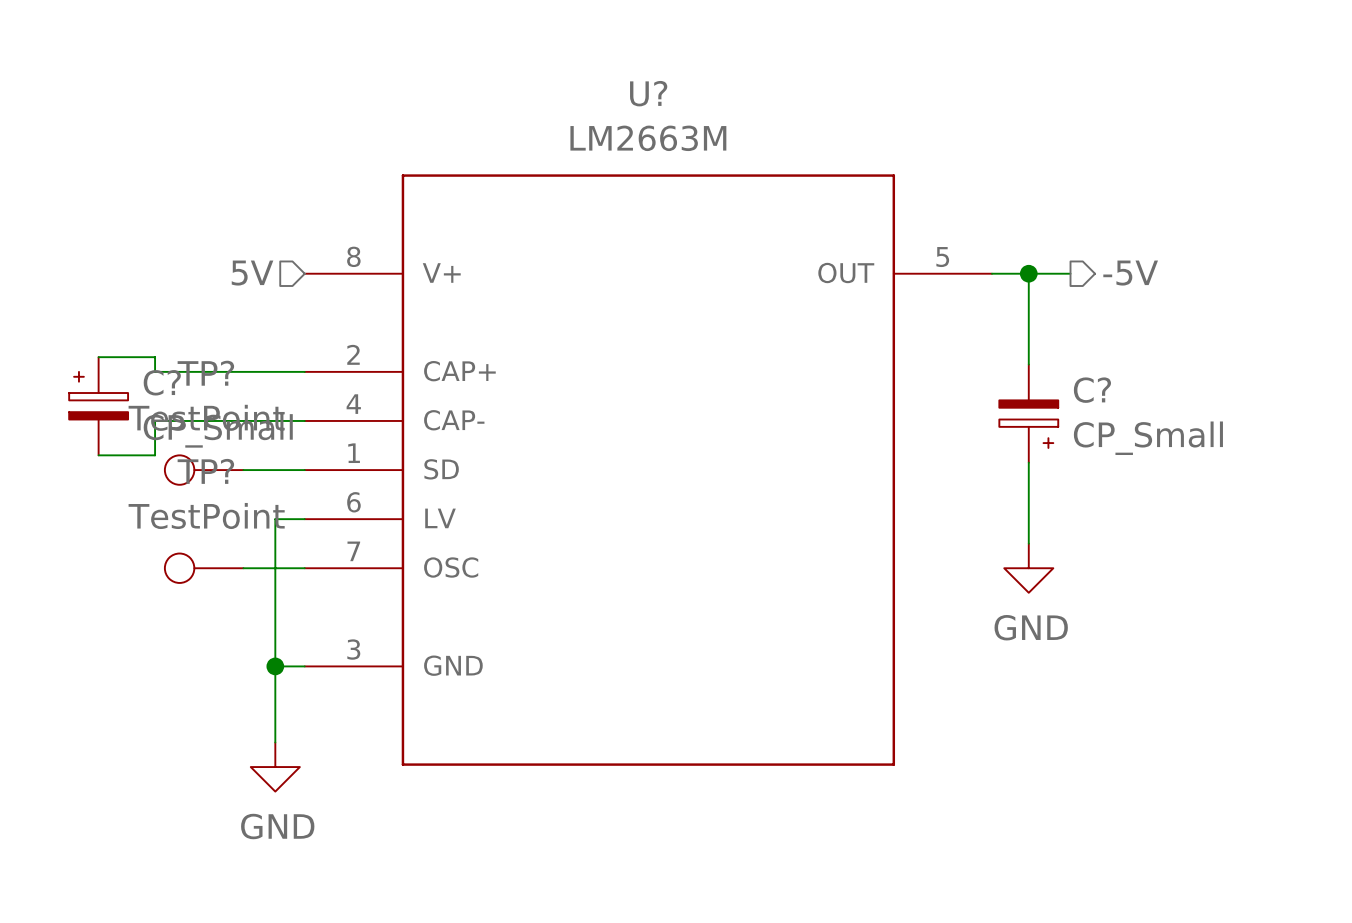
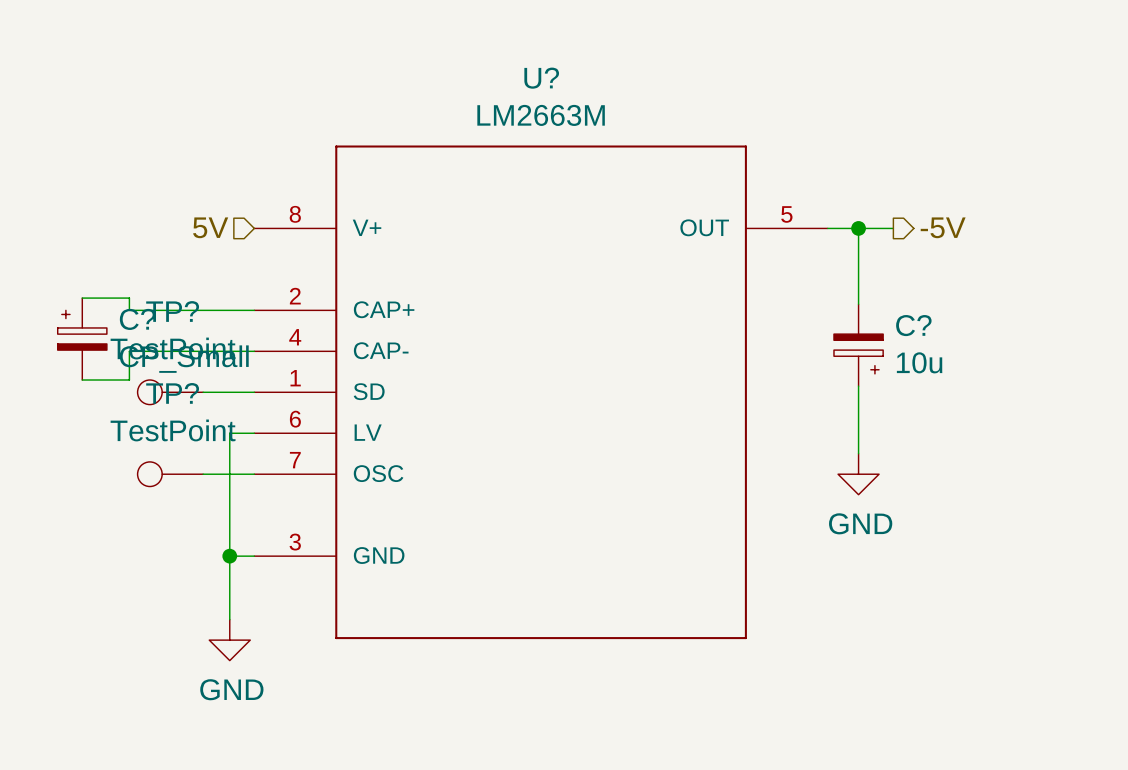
C? value: CP_Small (1148, 438) -> 10u (919, 362)

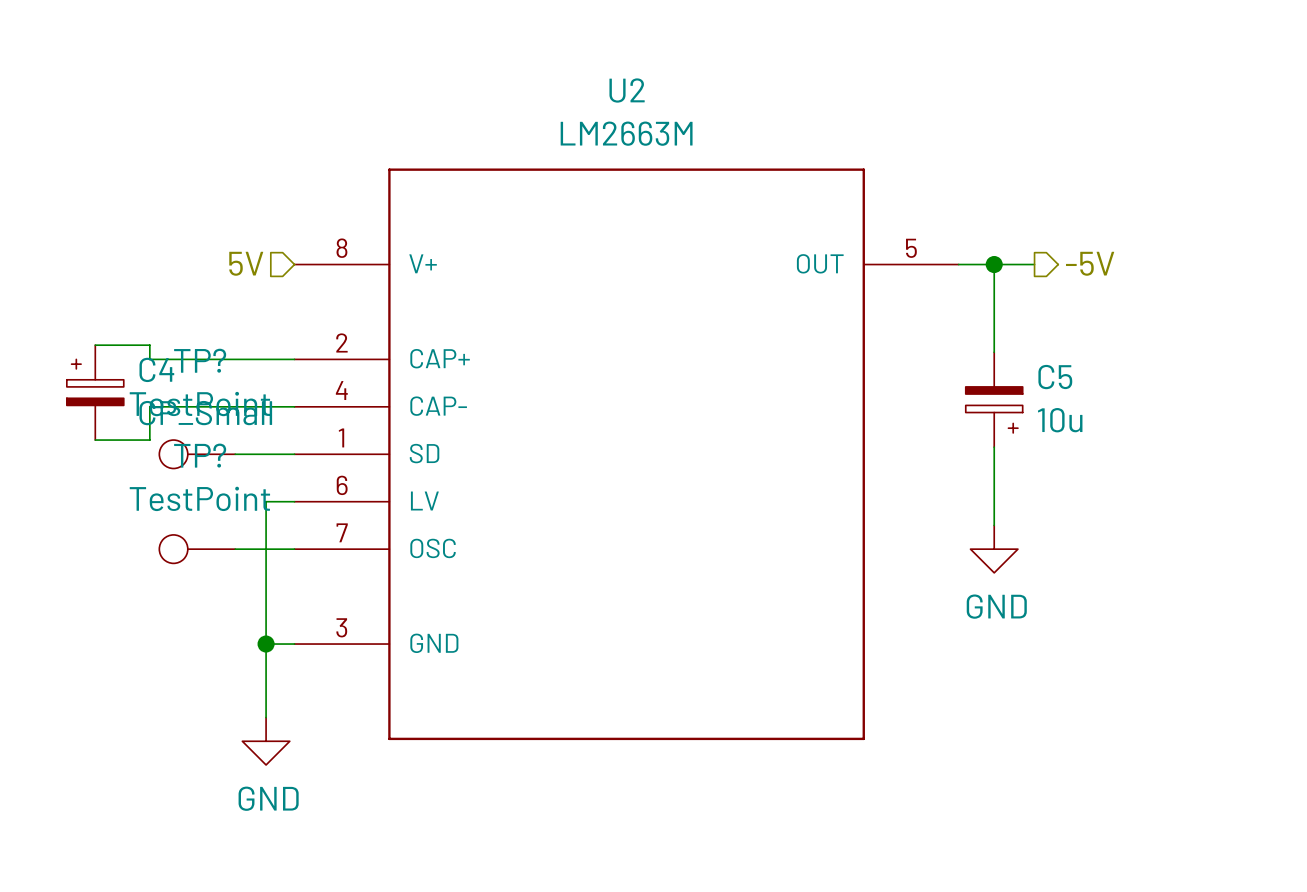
U? name: U? (541, 78) -> U2 (627, 90)
C? name: C? (137, 319) -> C4 (156, 369)
C? name: C? (913, 325) -> C5 (1055, 377)

